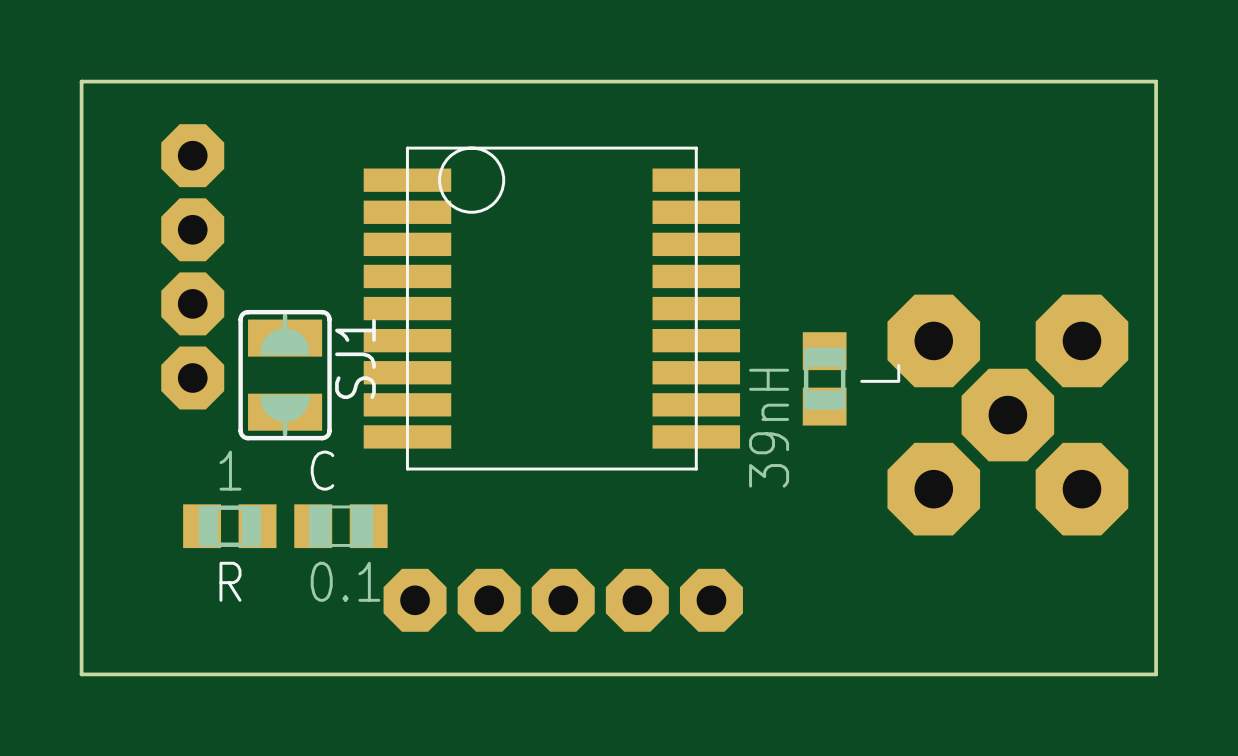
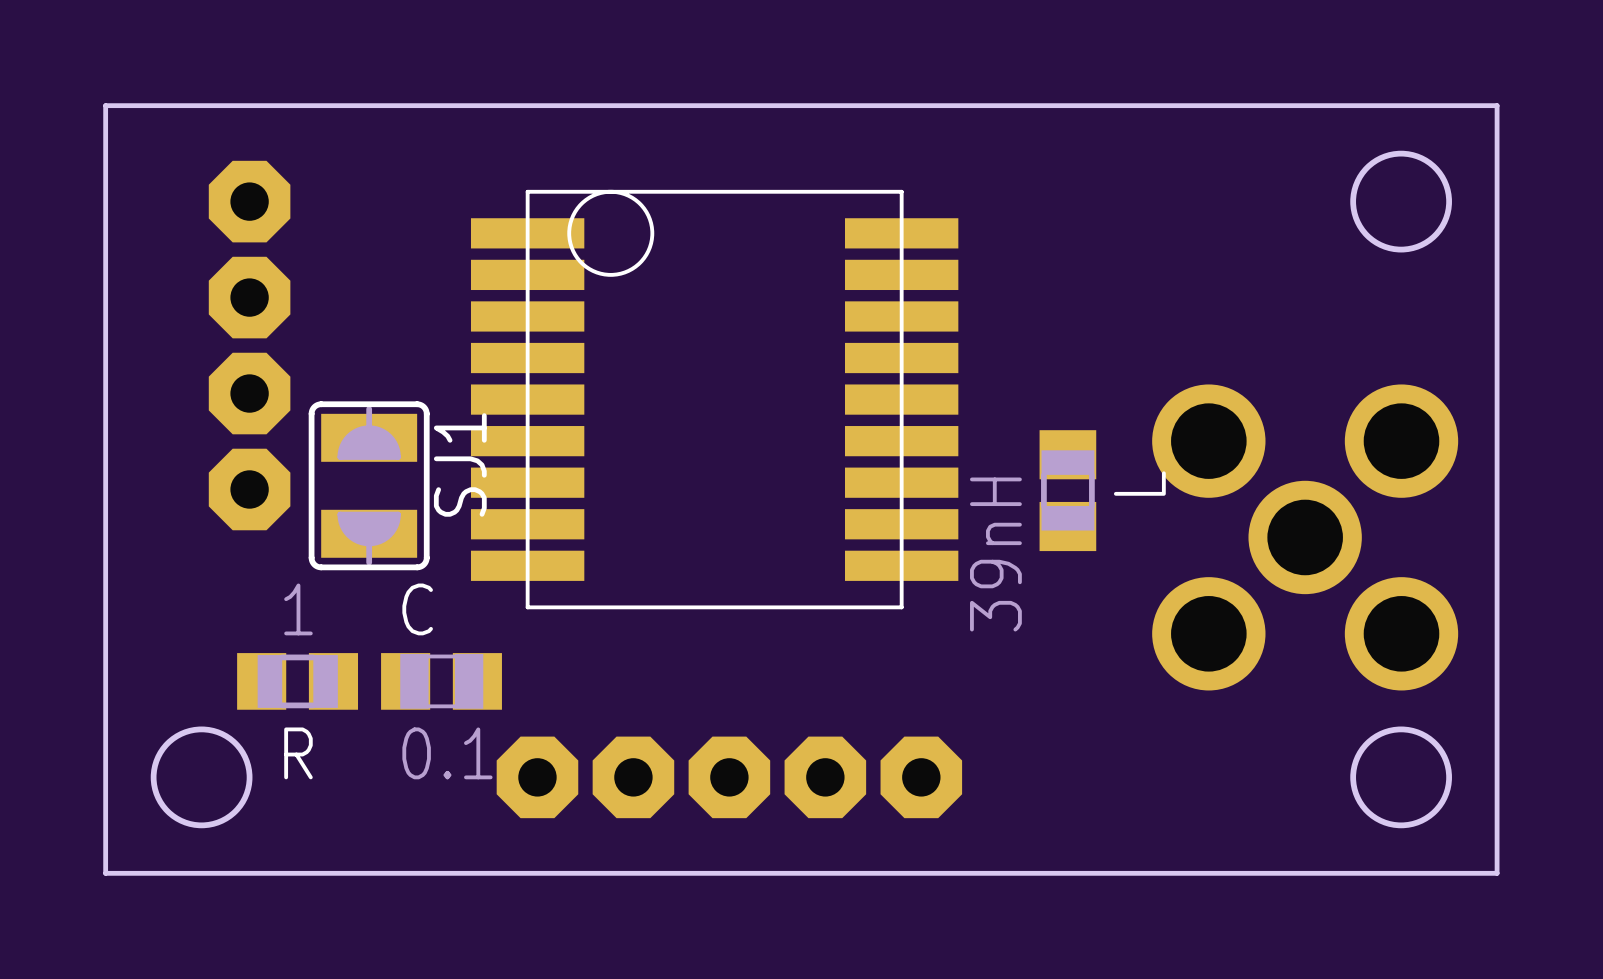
round board edge: none -> [1350, 150, 1452, 253]
part: (933, 340) -> none
part: (1081, 340) -> none
part footprint: [961, 368, 1055, 462] -> [1152, 384, 1459, 691]
part: (933, 489) -> none
part: (1081, 489) -> none
round board edge: none -> [150, 726, 253, 829]
round board edge: none -> [1350, 726, 1452, 829]

